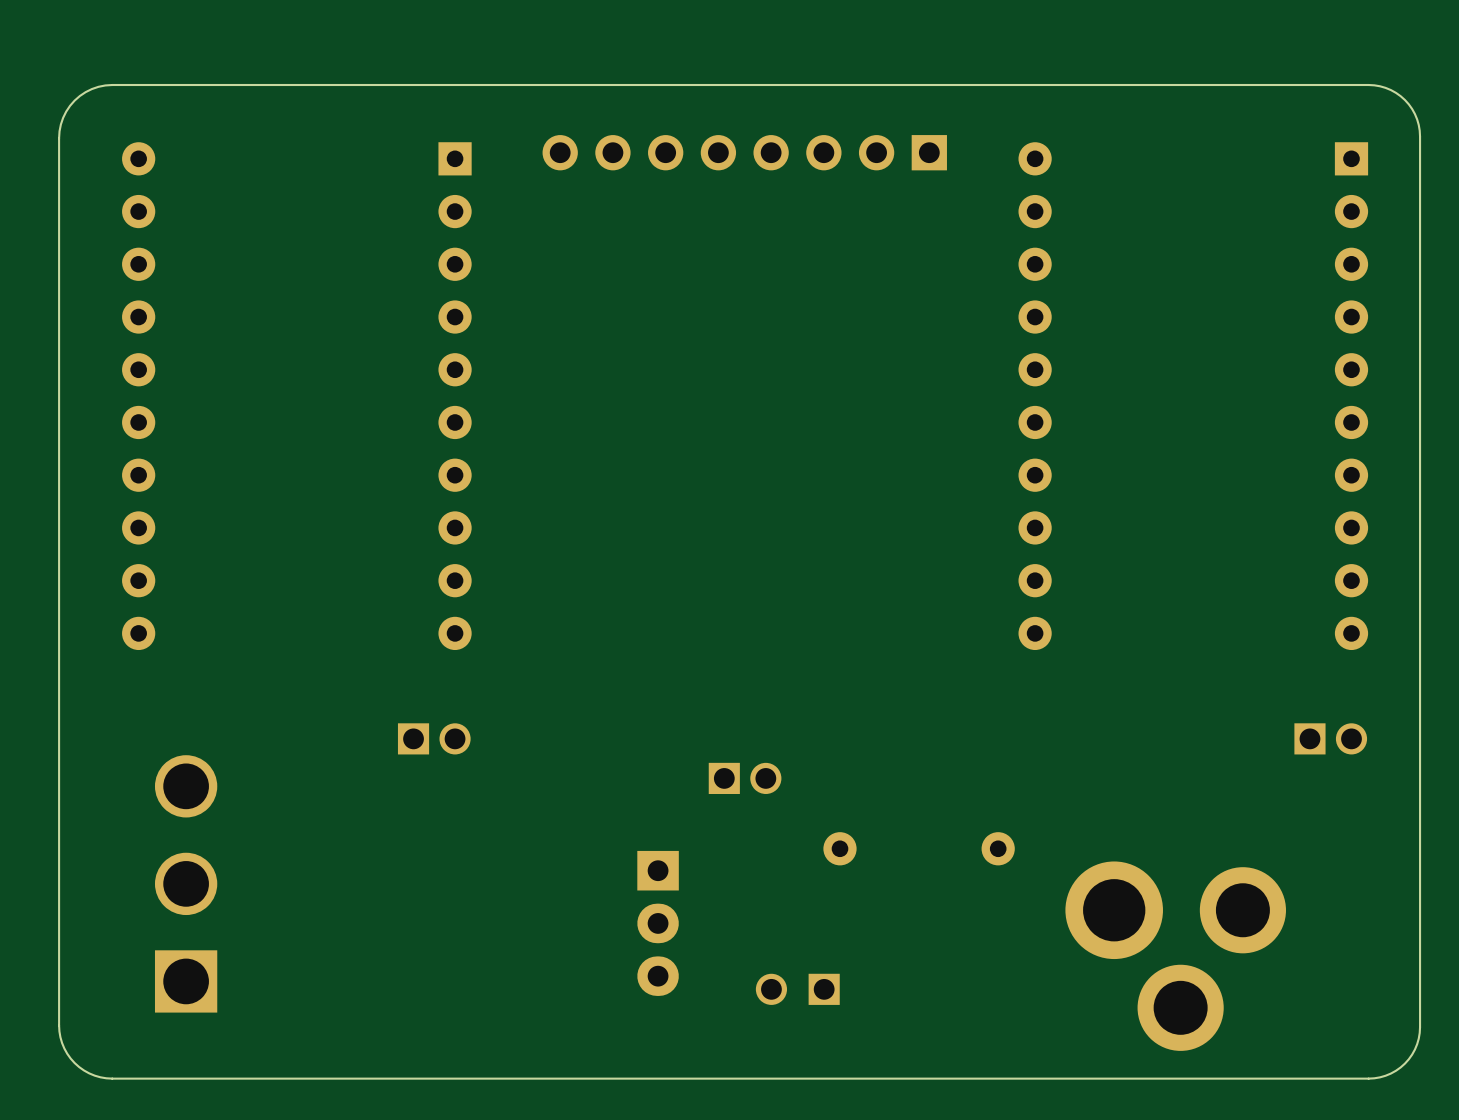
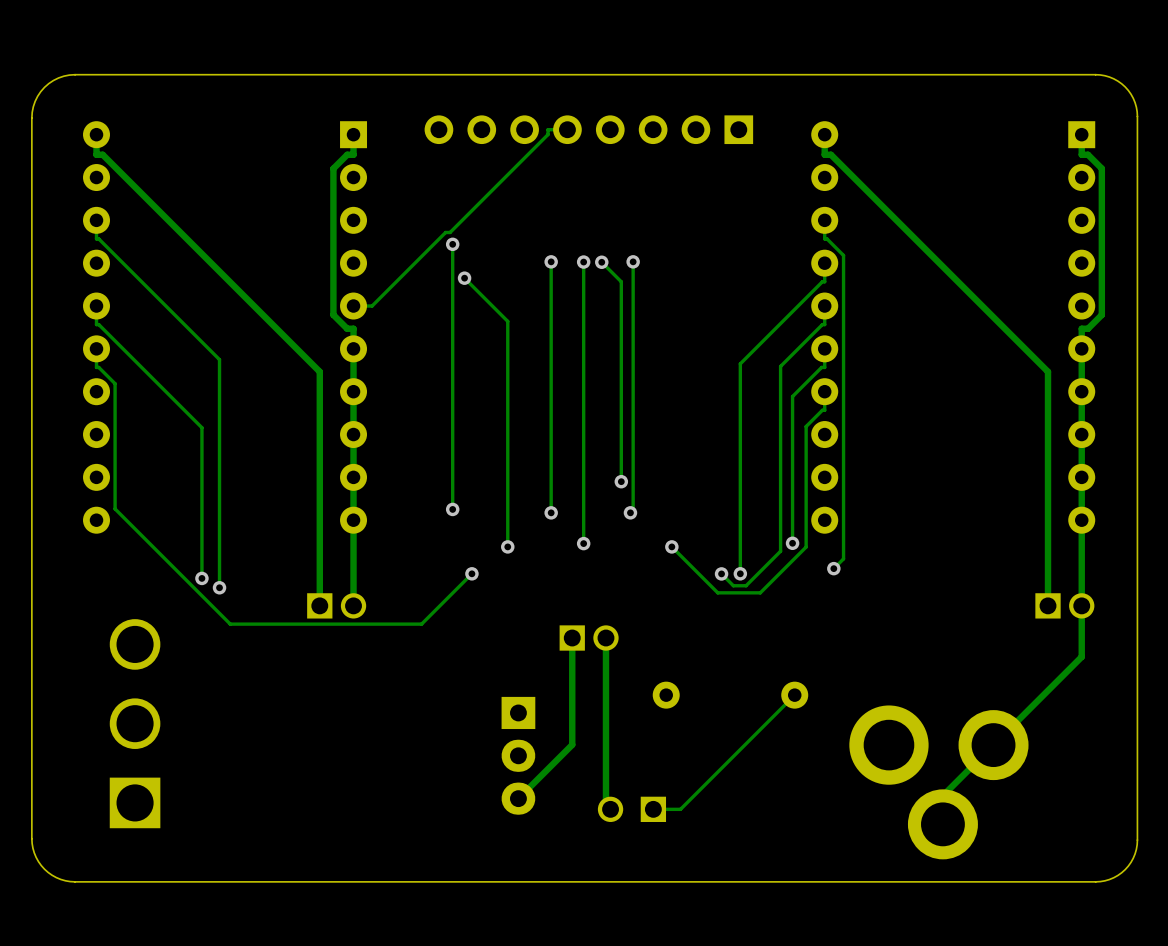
track: none -> (567, 129) (548, 129) (548, 134) (450, 232) (445, 232) (372, 306) (353, 306)
track: none -> (96, 134) (96, 154) (102, 154) (319, 371) (319, 605)
track: none -> (353, 134) (353, 154) (347, 154) (333, 168) (333, 314) (347, 328) (353, 328) (353, 605)
track: none -> (824, 134) (824, 154) (831, 154) (1048, 371) (1048, 605)
track: none -> (1081, 134) (1081, 154) (1088, 154) (1101, 168) (1101, 314) (1088, 328) (1081, 328) (1081, 656) (942, 795)
track: none -> (96, 220) (96, 238) (98, 238) (219, 359) (219, 587)
track: none -> (824, 220) (824, 238) (827, 238) (843, 255) (843, 558) (833, 568)
track: none -> (452, 244) (452, 509)
via: none -> (452, 244)
track: none -> (551, 261) (551, 512)
via: none -> (551, 261)
track: none -> (583, 262) (583, 543)
via: none -> (583, 262)
track: none -> (601, 262) (621, 281) (621, 481)
via: none -> (601, 262)
track: none -> (633, 261) (633, 510) (630, 512)
via: none -> (633, 261)
track: none -> (824, 263) (824, 281) (822, 281) (740, 363) (740, 573)
track: none -> (464, 278) (507, 321) (507, 546)
via: none -> (464, 278)
track: none -> (96, 306) (96, 324) (98, 324) (201, 427) (201, 578)
track: none -> (824, 306) (824, 324) (822, 324) (780, 366) (780, 551) (746, 585) (733, 585) (721, 573)
track: none -> (96, 348) (96, 367) (98, 367) (115, 383) (115, 508) (230, 624) (421, 624) (471, 573)
track: none -> (824, 348) (824, 367) (821, 367) (792, 396) (792, 543)
track: none -> (824, 391) (824, 410) (822, 410) (806, 426) (806, 547) (760, 592) (717, 592) (671, 546)
via: none -> (621, 481)
via: none -> (452, 509)
via: none -> (551, 512)
via: none -> (630, 512)
via: none -> (792, 543)
via: none -> (583, 543)
via: none -> (507, 546)
via: none -> (671, 546)
via: none -> (833, 568)
via: none -> (471, 573)
via: none -> (721, 573)
via: none -> (740, 573)
via: none -> (201, 578)
via: none -> (219, 587)
track: none -> (572, 638) (572, 744) (518, 798)
track: none -> (605, 638) (605, 804)
track: none -> (794, 695) (680, 809) (653, 809)

